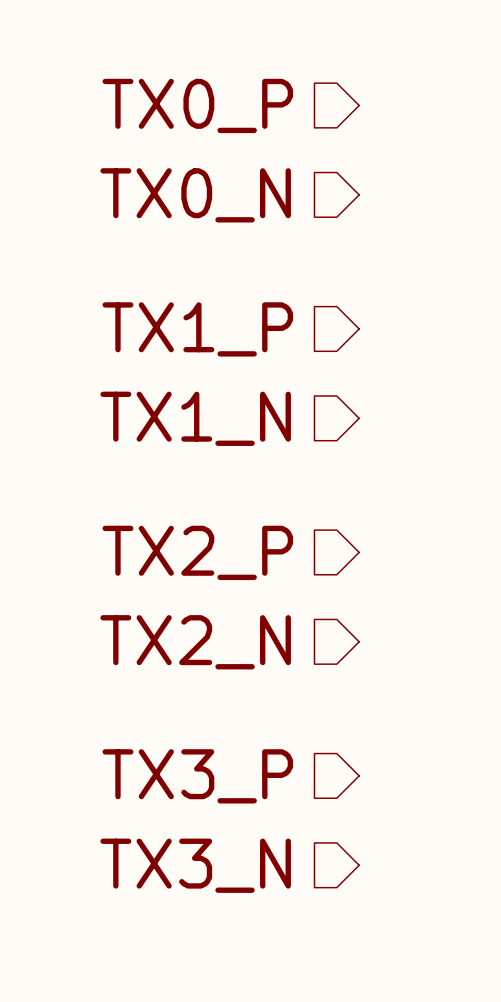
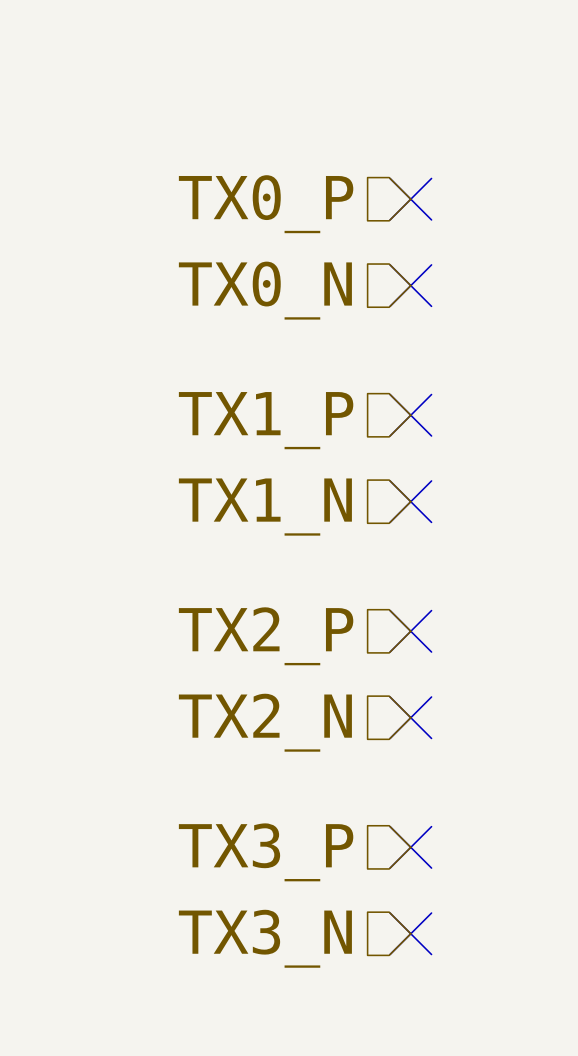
no-connect mark: none -> (410, 199)
no-connect mark: none -> (410, 285)
no-connect mark: none -> (410, 415)
no-connect mark: none -> (410, 501)
no-connect mark: none -> (410, 631)
no-connect mark: none -> (410, 717)
no-connect mark: none -> (410, 847)
no-connect mark: none -> (410, 933)

